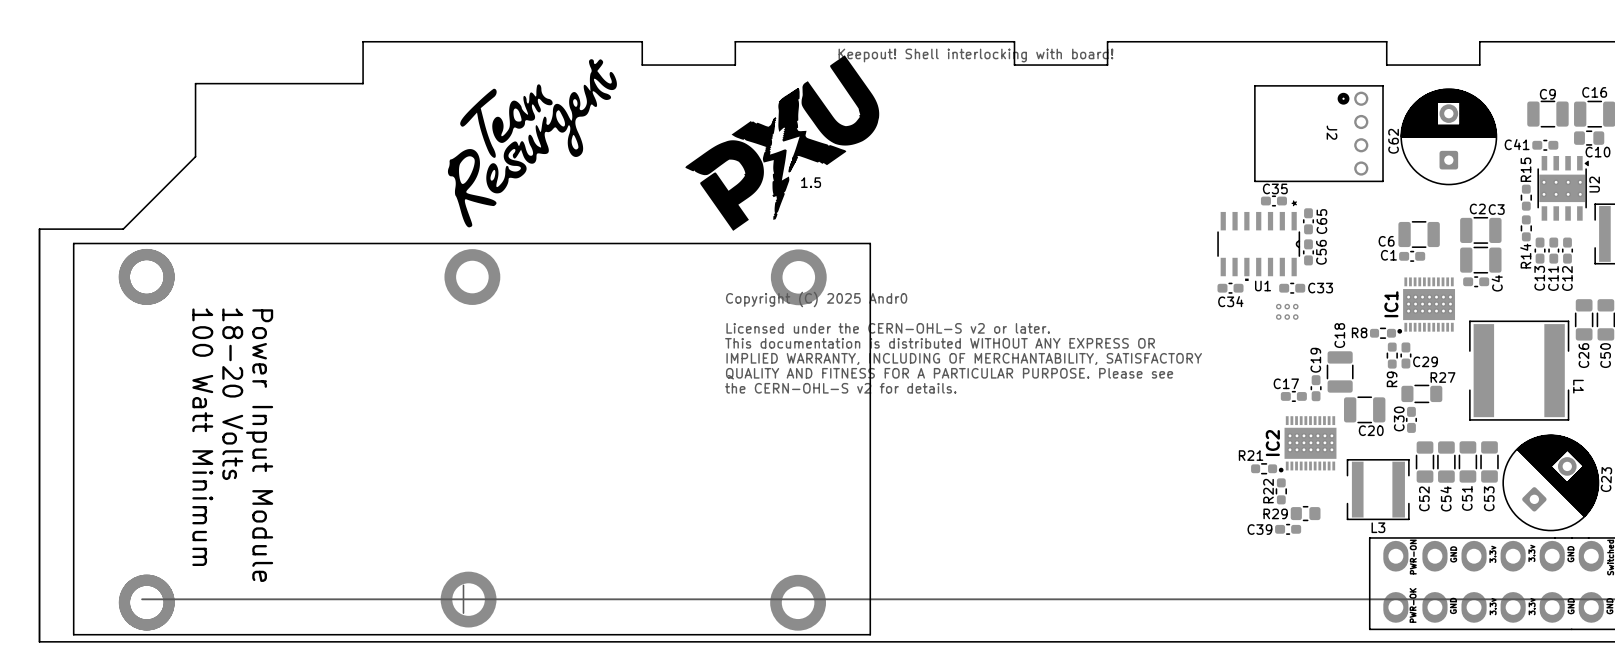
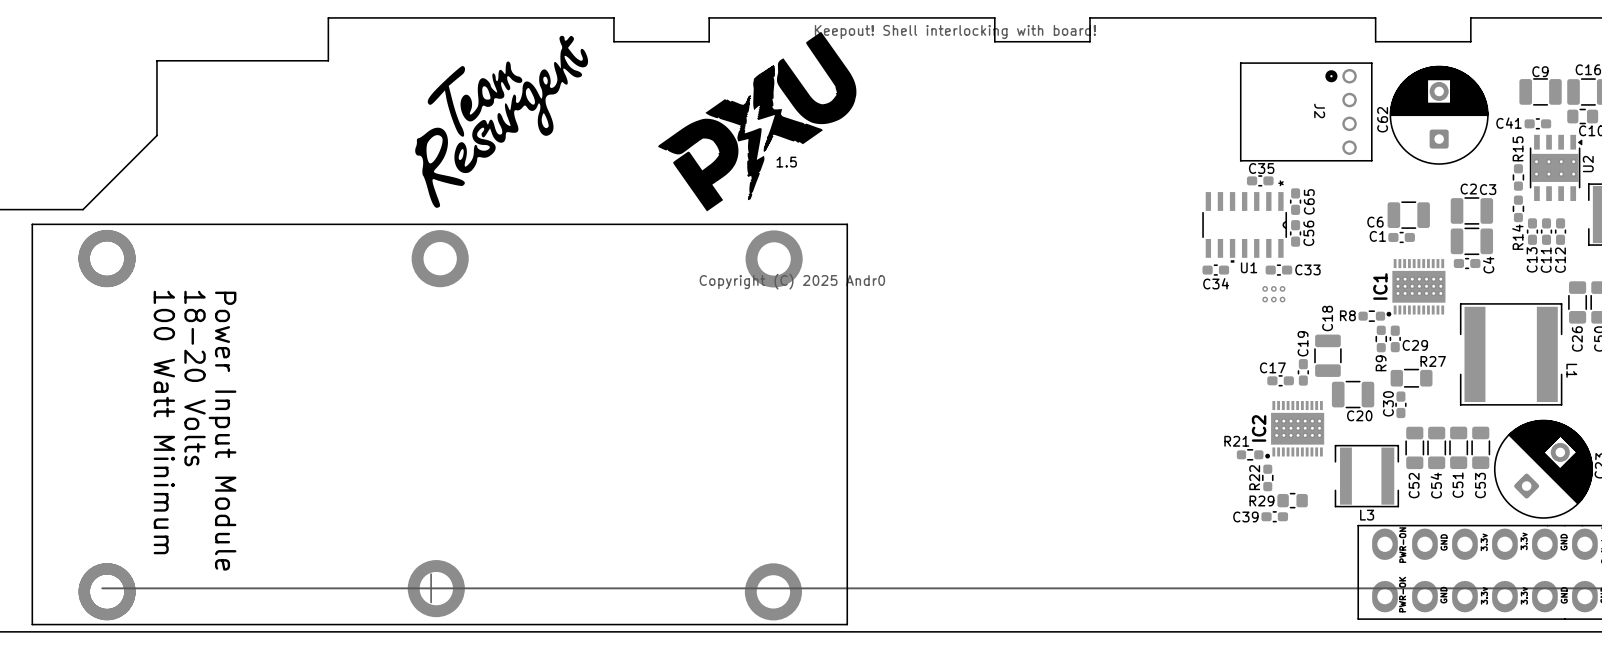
text: Licensed under the CERN-OHL-S v2 or later. (888, 328) -> none
text: This documentation is distributed WITHOUT ANY EXPRESS OR (940, 343) -> none
text: IMPLIED WARRANTY, INCLUDING OF MERCHANTABILITY, SATISFACTORY (964, 358) -> none
text: QUALITY AND FITNESS FOR A PARTICULAR PURPOSE. Please see (949, 373) -> none
text: the CERN-OHL-S v2 for details. (840, 388) -> none

